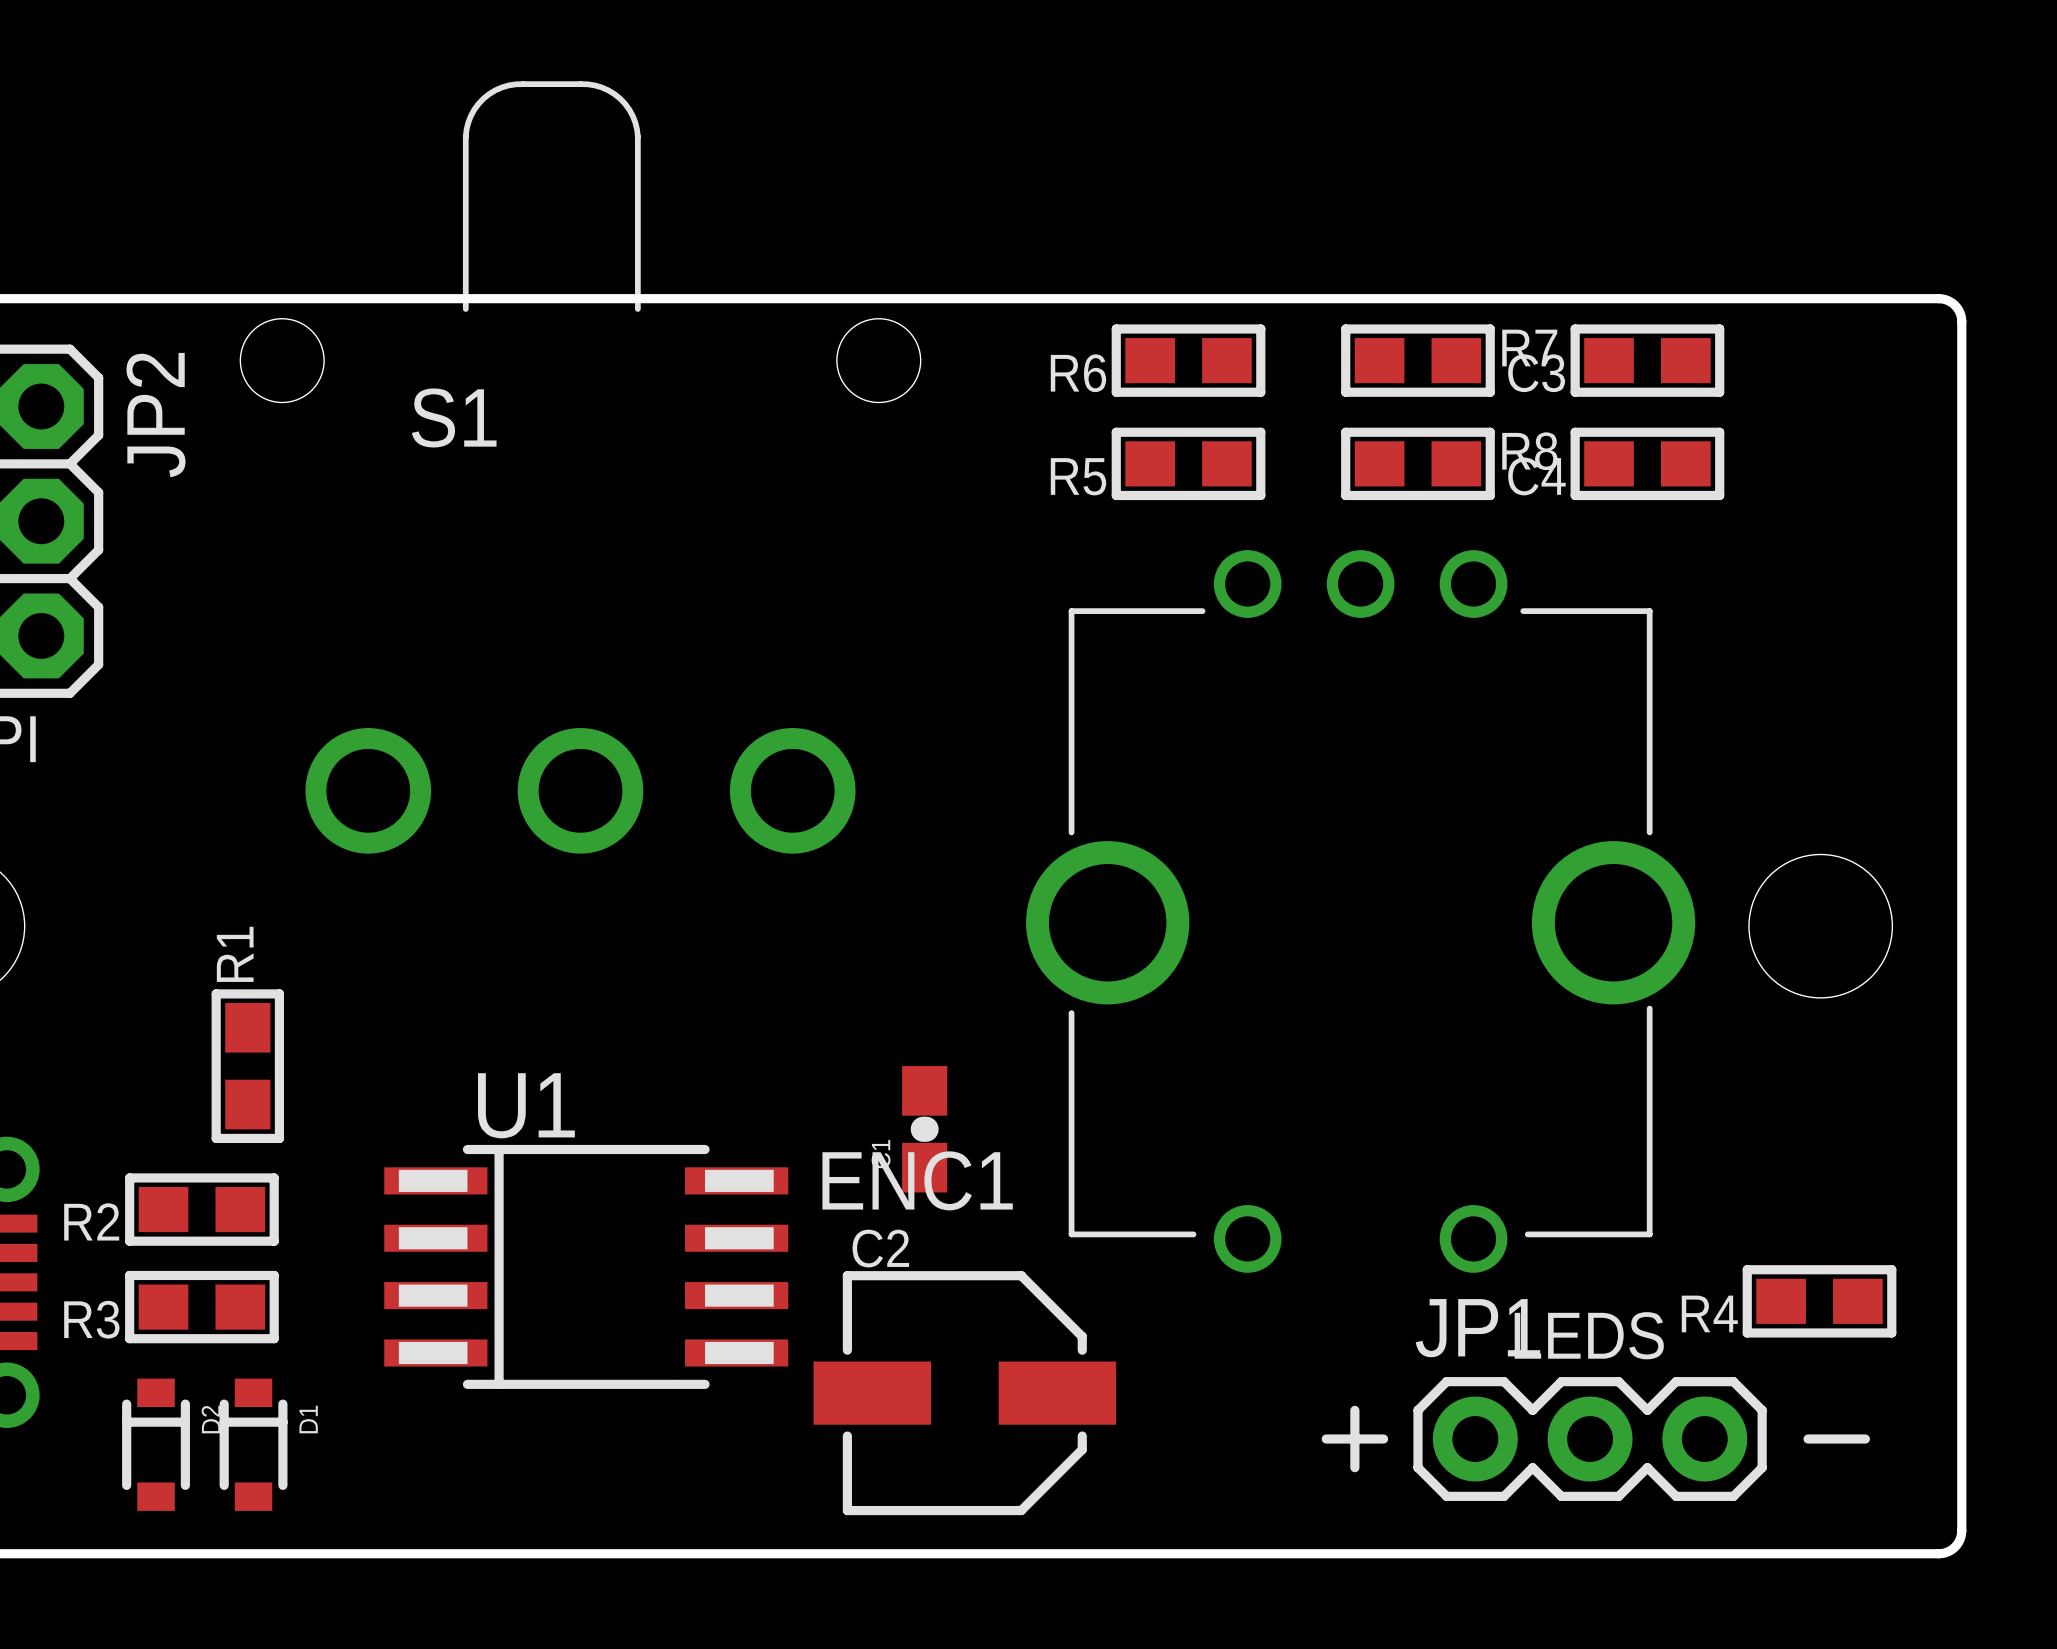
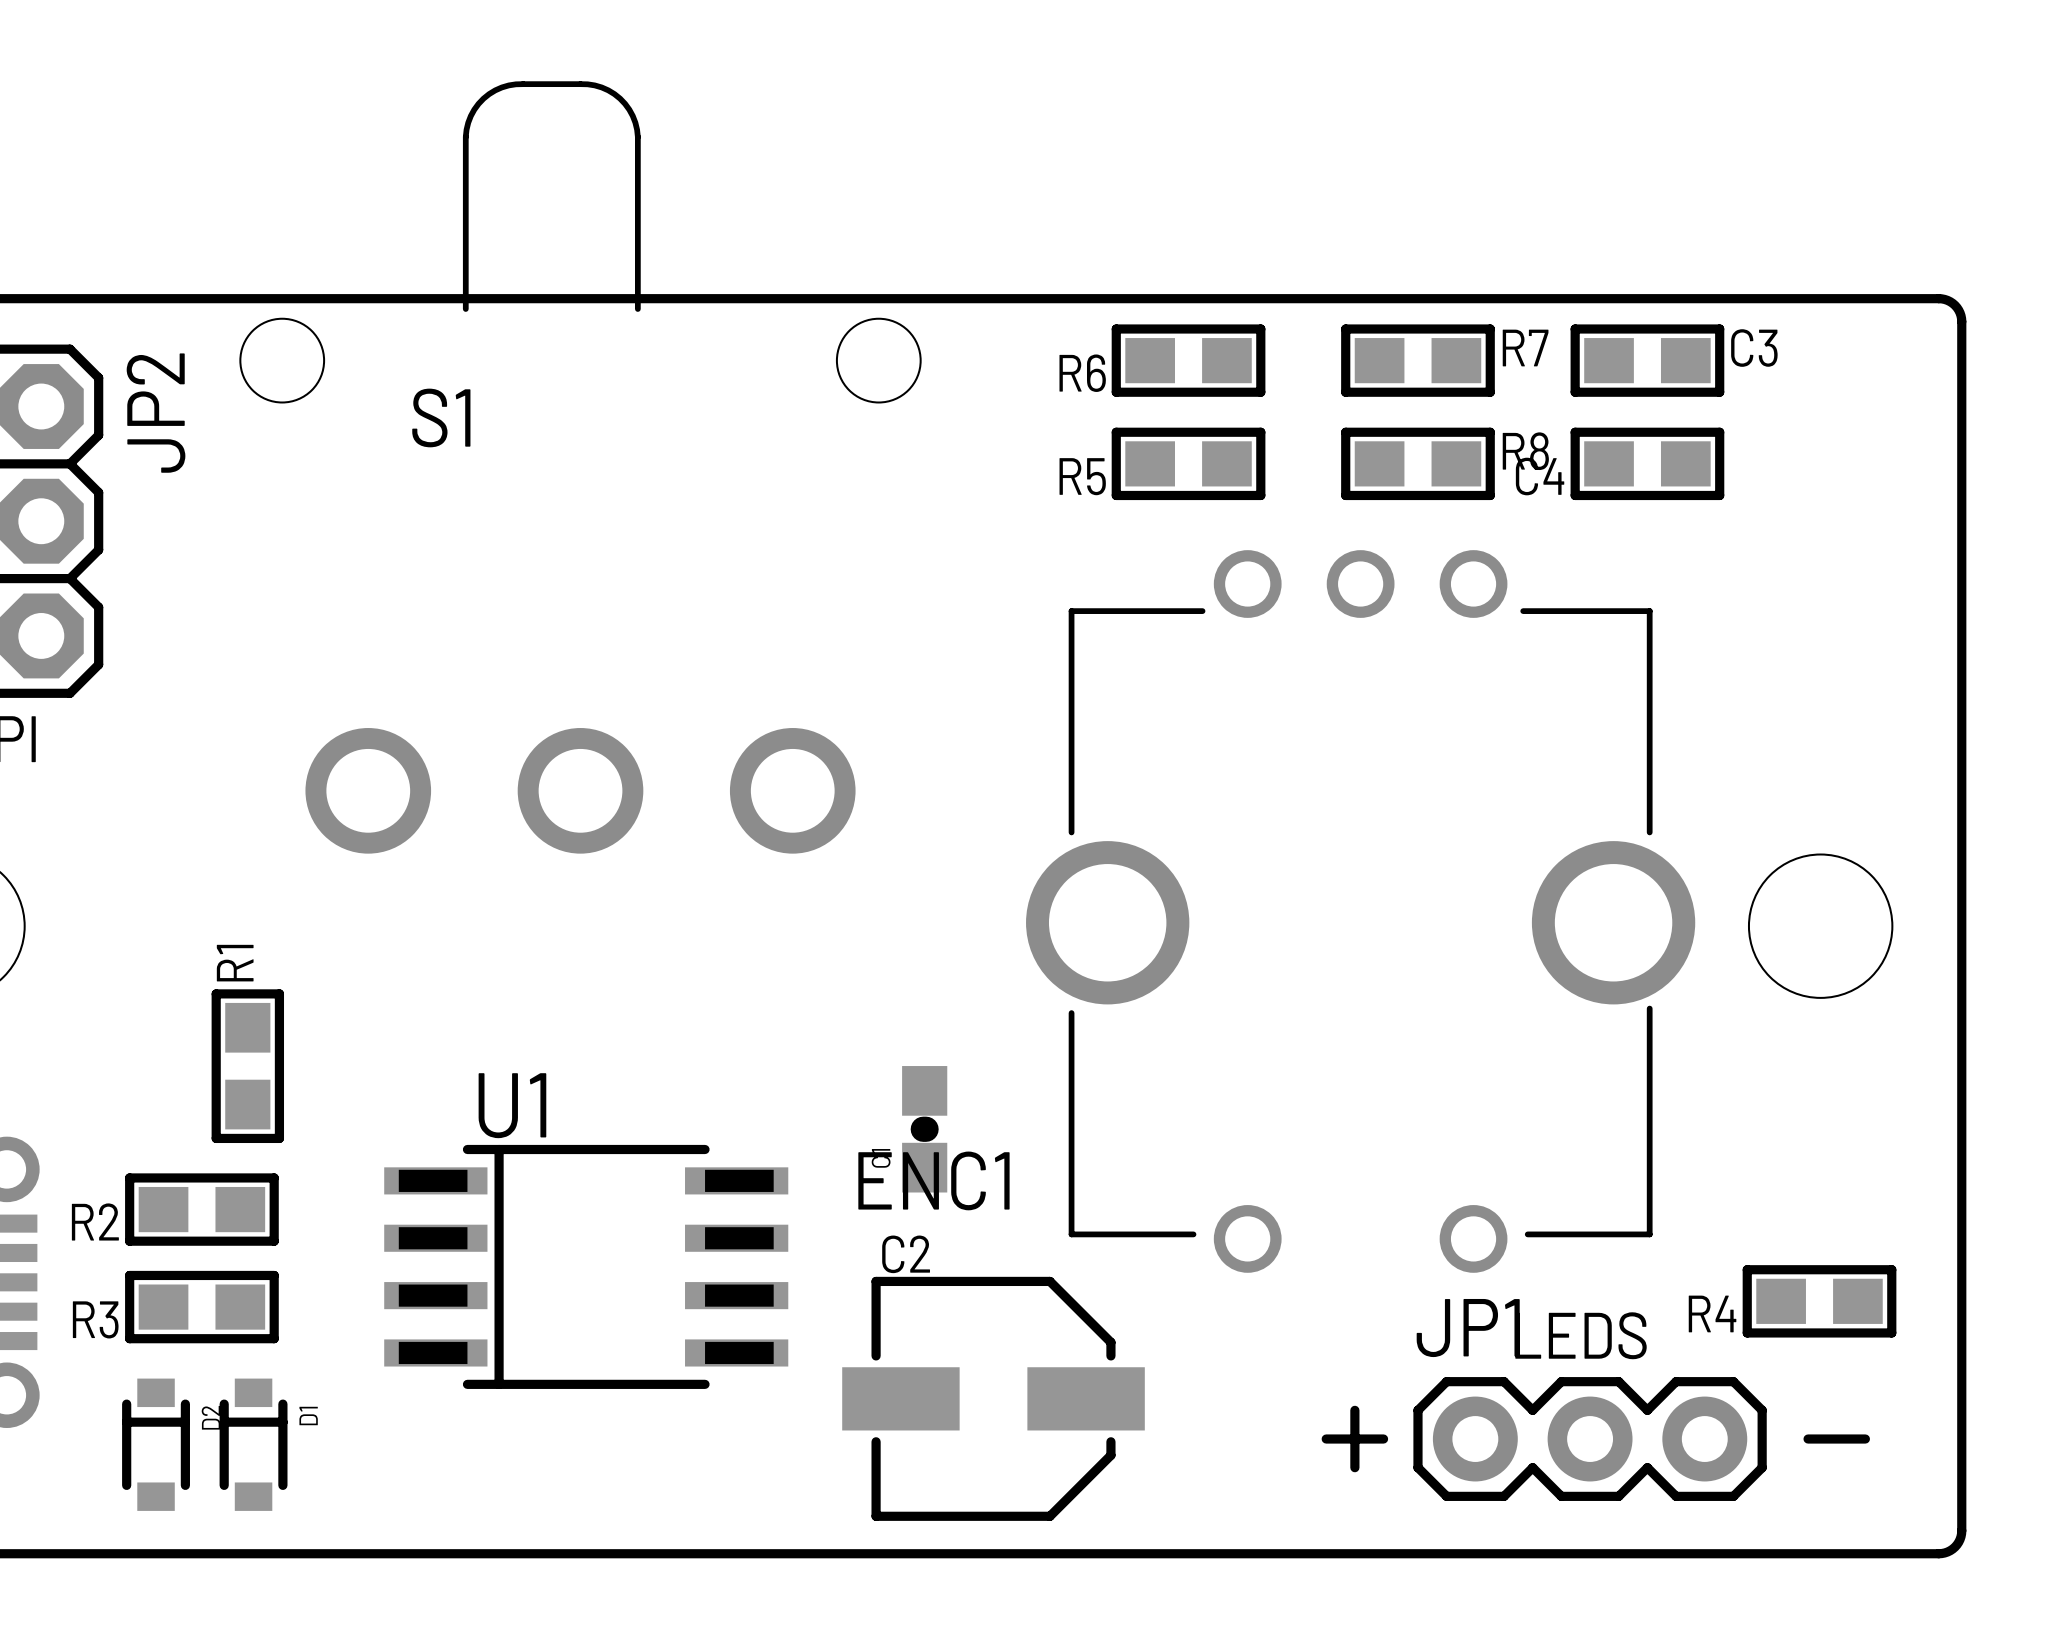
C3 name position: C3 (1536, 373) -> C3 (1754, 348)
C2 position: (964, 1393) -> (993, 1398)

